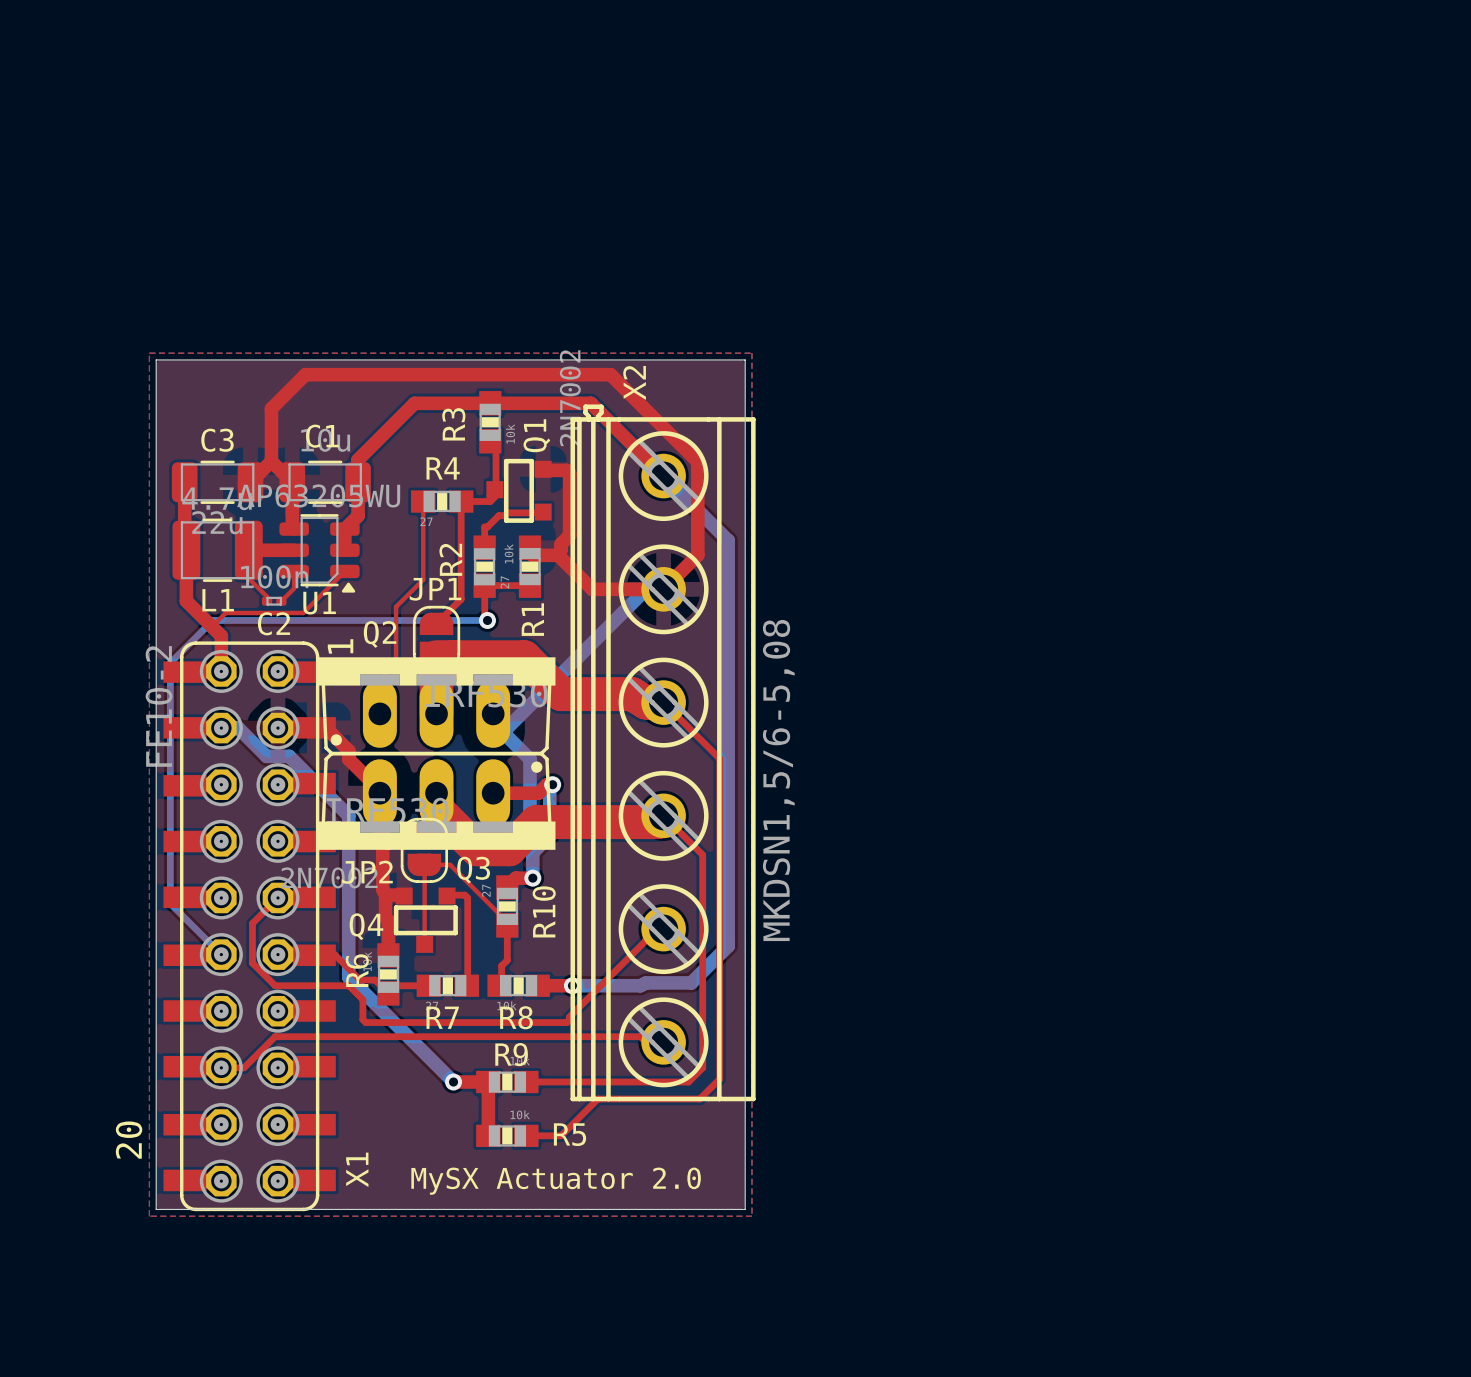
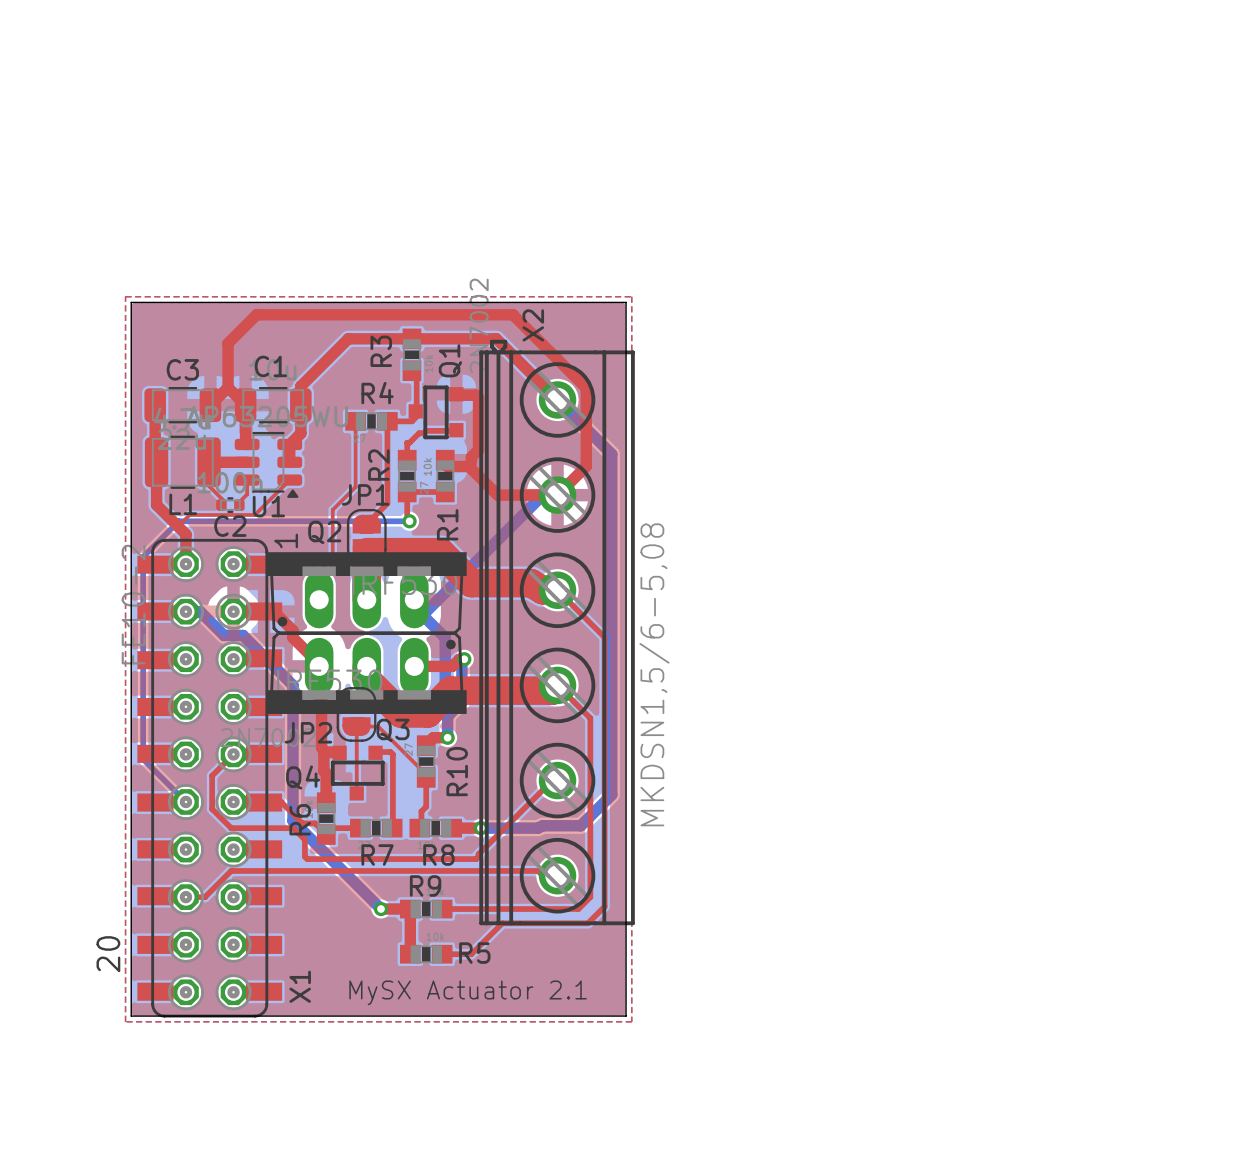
C2 footprint: [261, 596, 287, 606] -> [216, 497, 245, 513]
text: MySX Actuator 2.0 (556, 1181) -> MySX Actuator 2.1 (468, 992)

